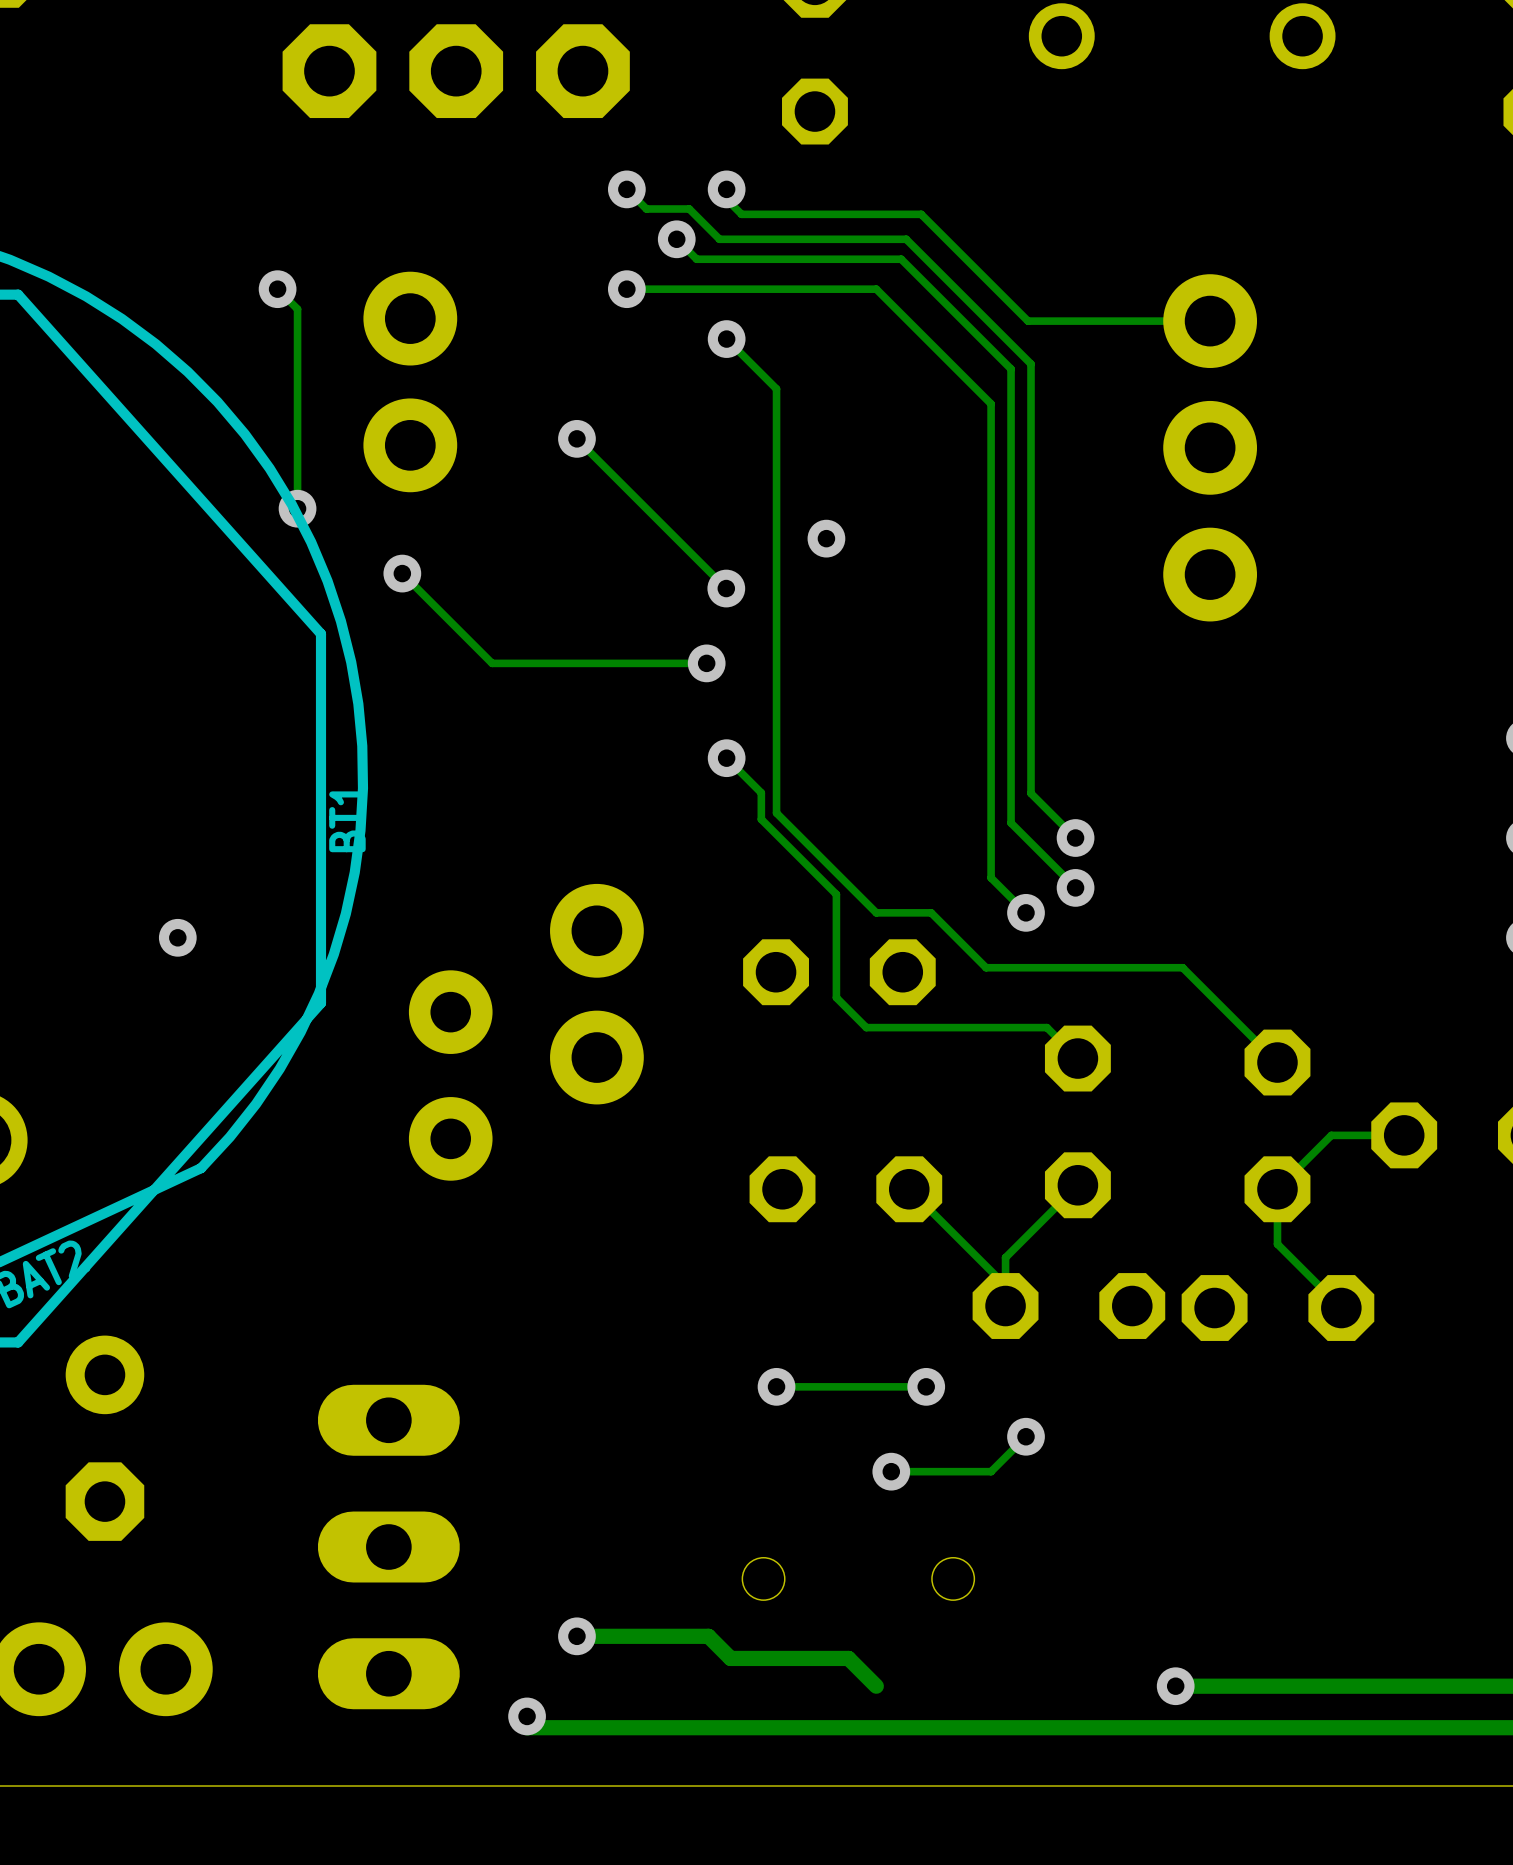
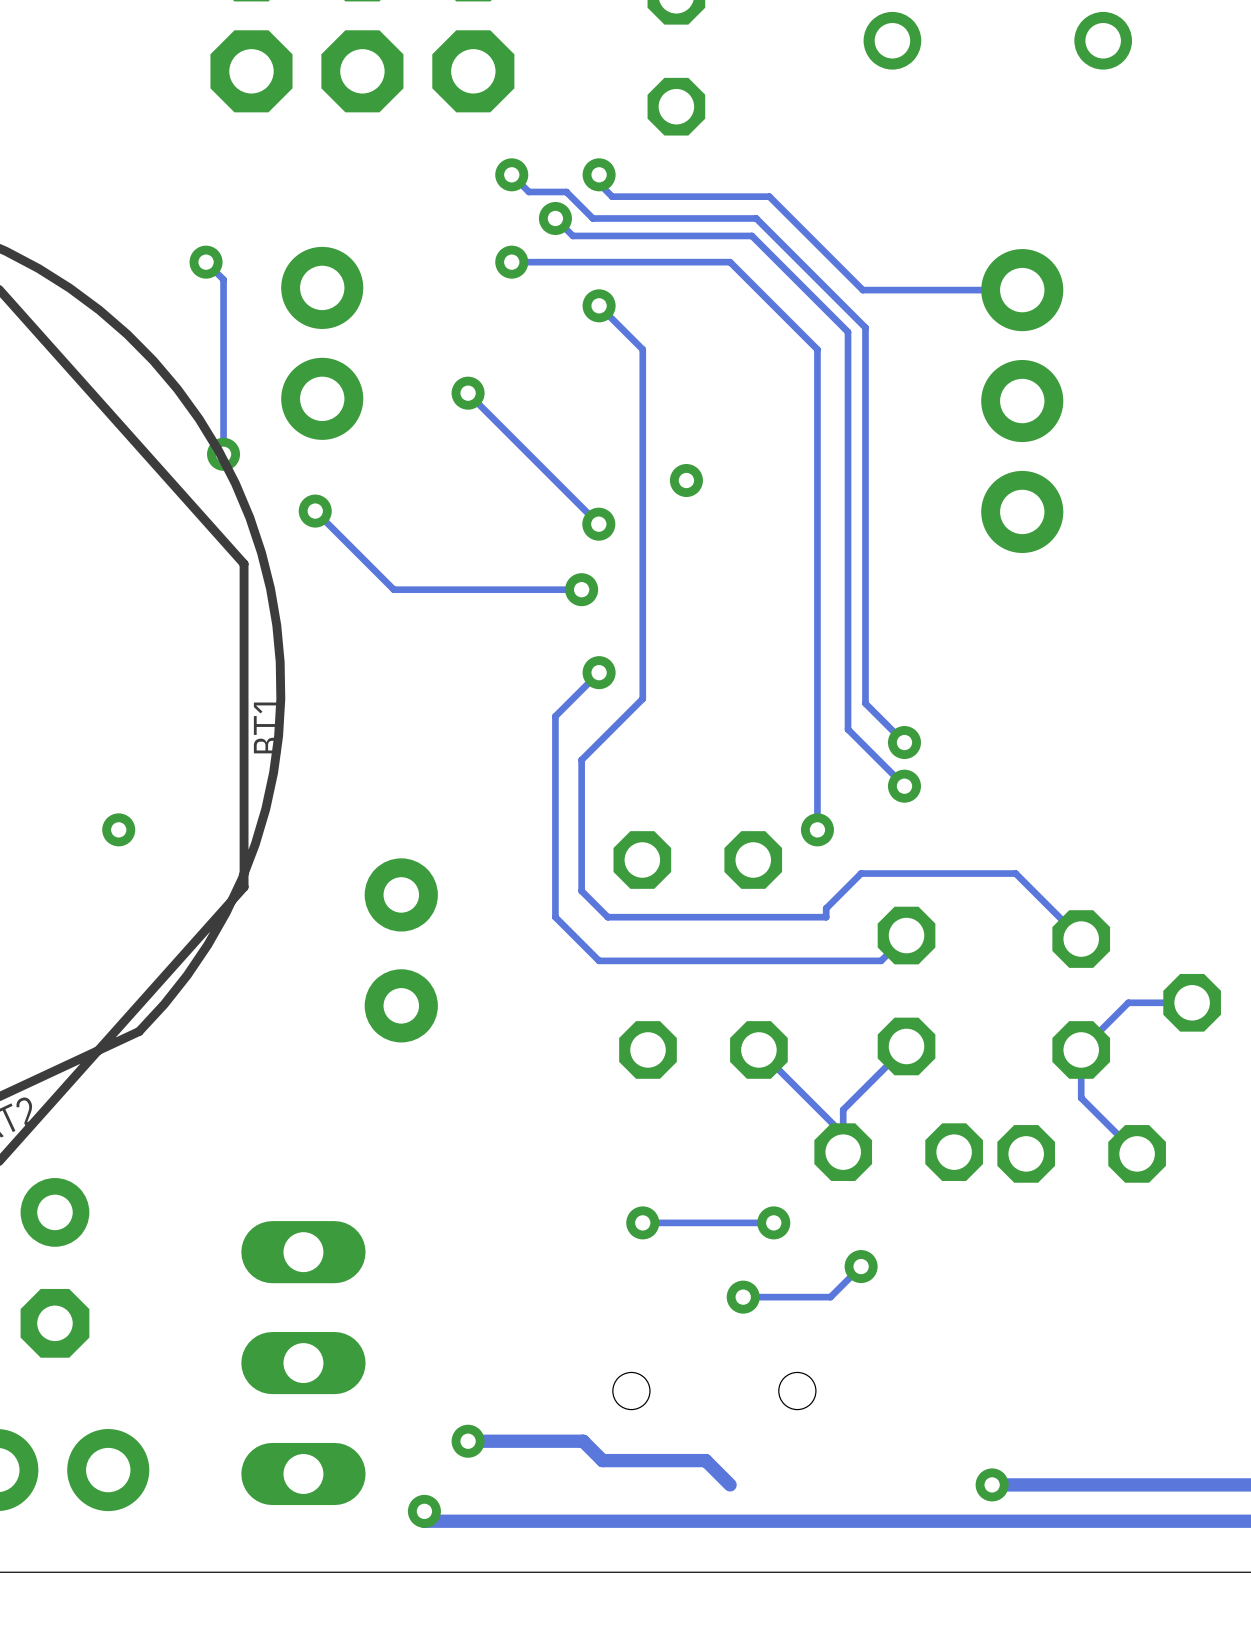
track: (976, 388) (991, 403) (991, 877) (1026, 912) -> (817, 349) (817, 829)
track: (726, 758) (761, 792) (761, 819) (836, 894) (836, 997) (866, 1027) (1046, 1027) (1077, 1058) -> (599, 672) (555, 716) (555, 917) (599, 960) (881, 960) (906, 935)
track: (776, 788) (776, 813) (876, 912) (931, 912) (986, 967) (1182, 967) (1202, 987) -> (642, 698) (581, 759) (581, 891) (607, 917) (826, 917) (826, 908) (861, 873) (1015, 873)
via position: (1026, 912) -> (817, 829)
part: (596, 994) -> none
part position: (450, 1075) -> (401, 950)

